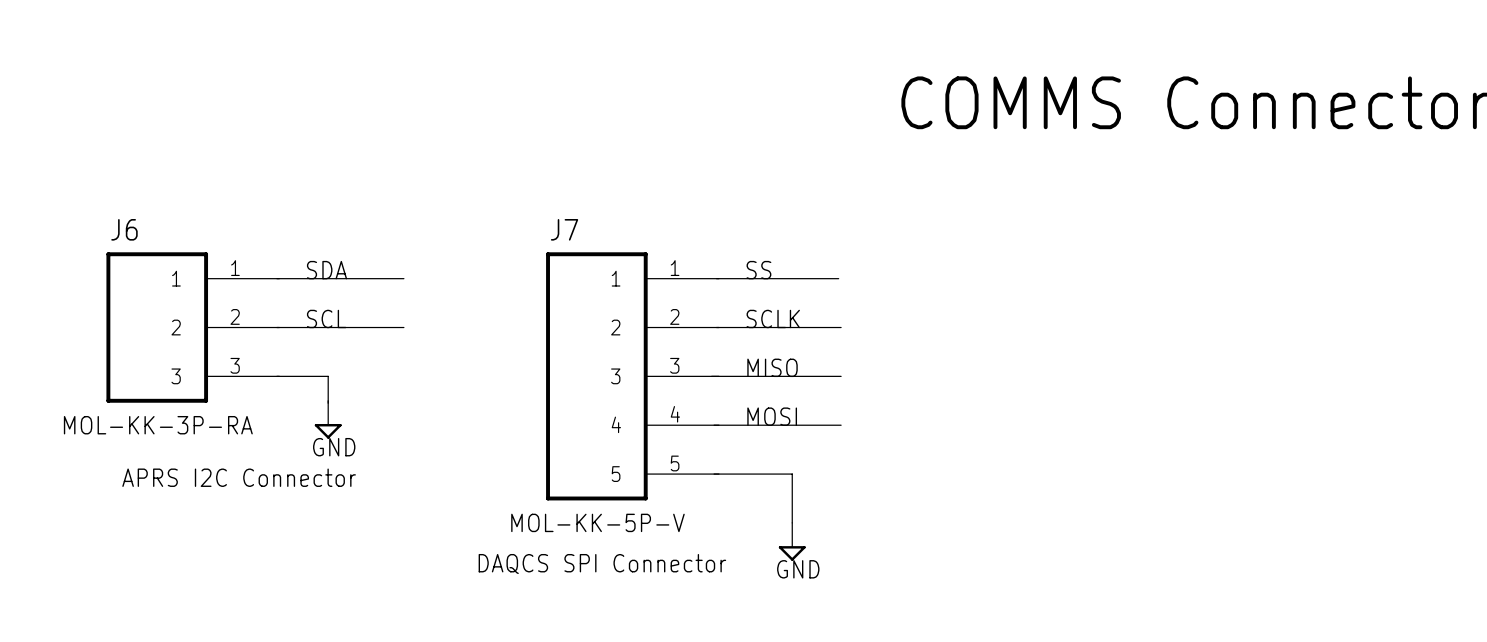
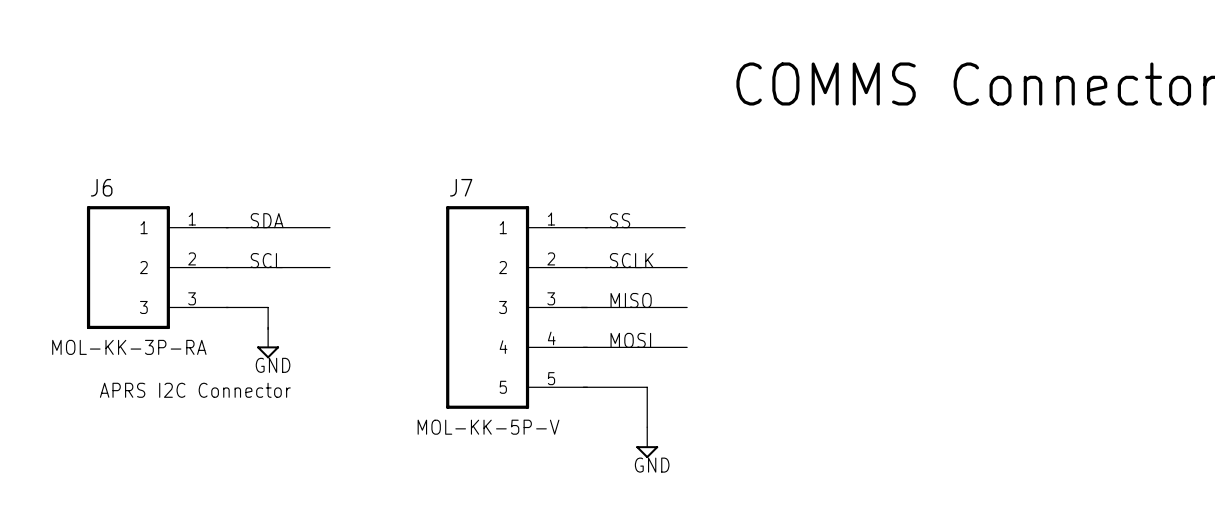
text: DAQCS SPI Connector (602, 564) -> none

